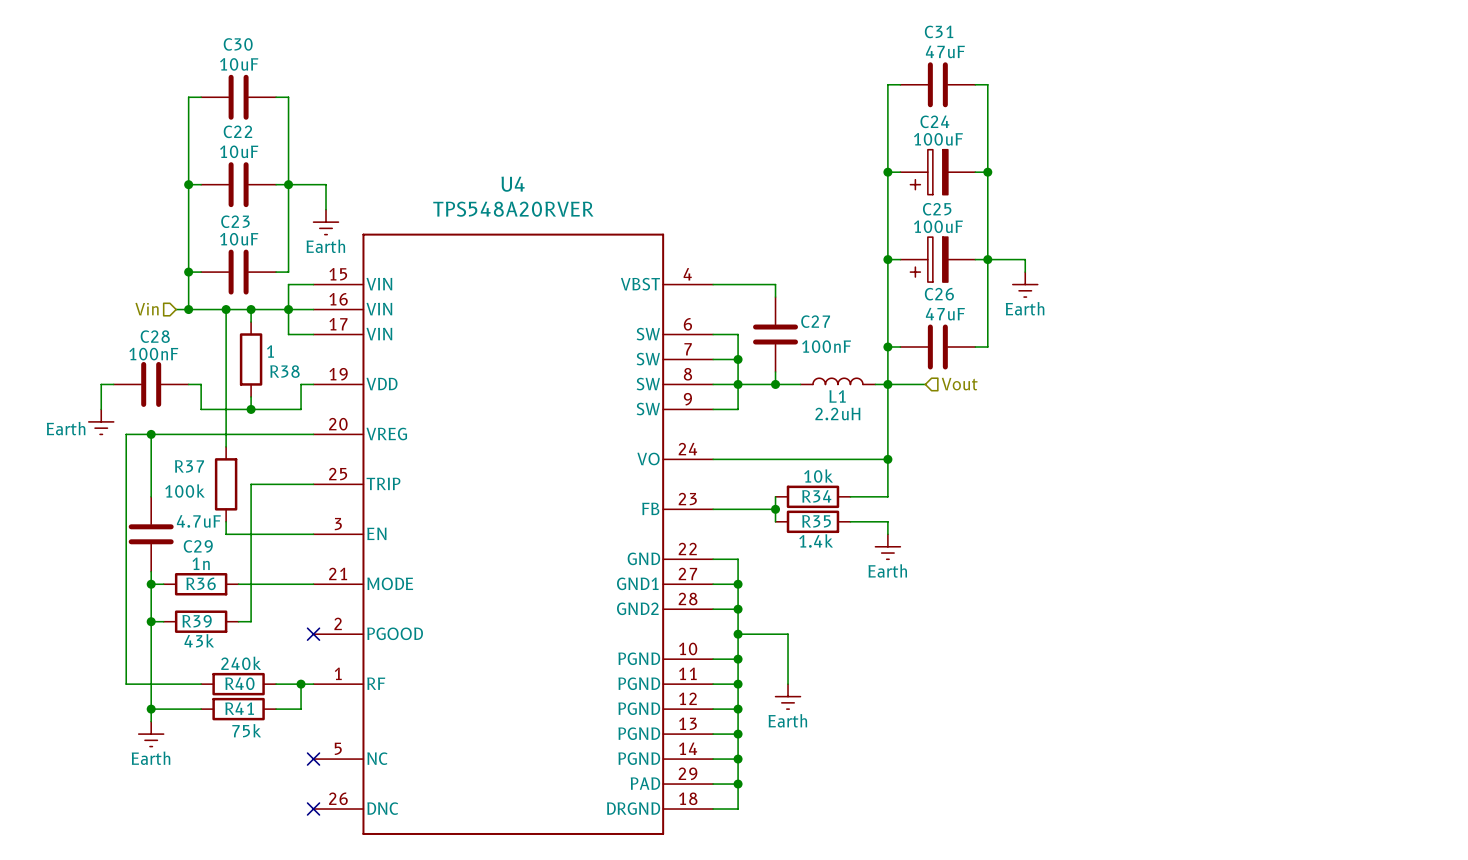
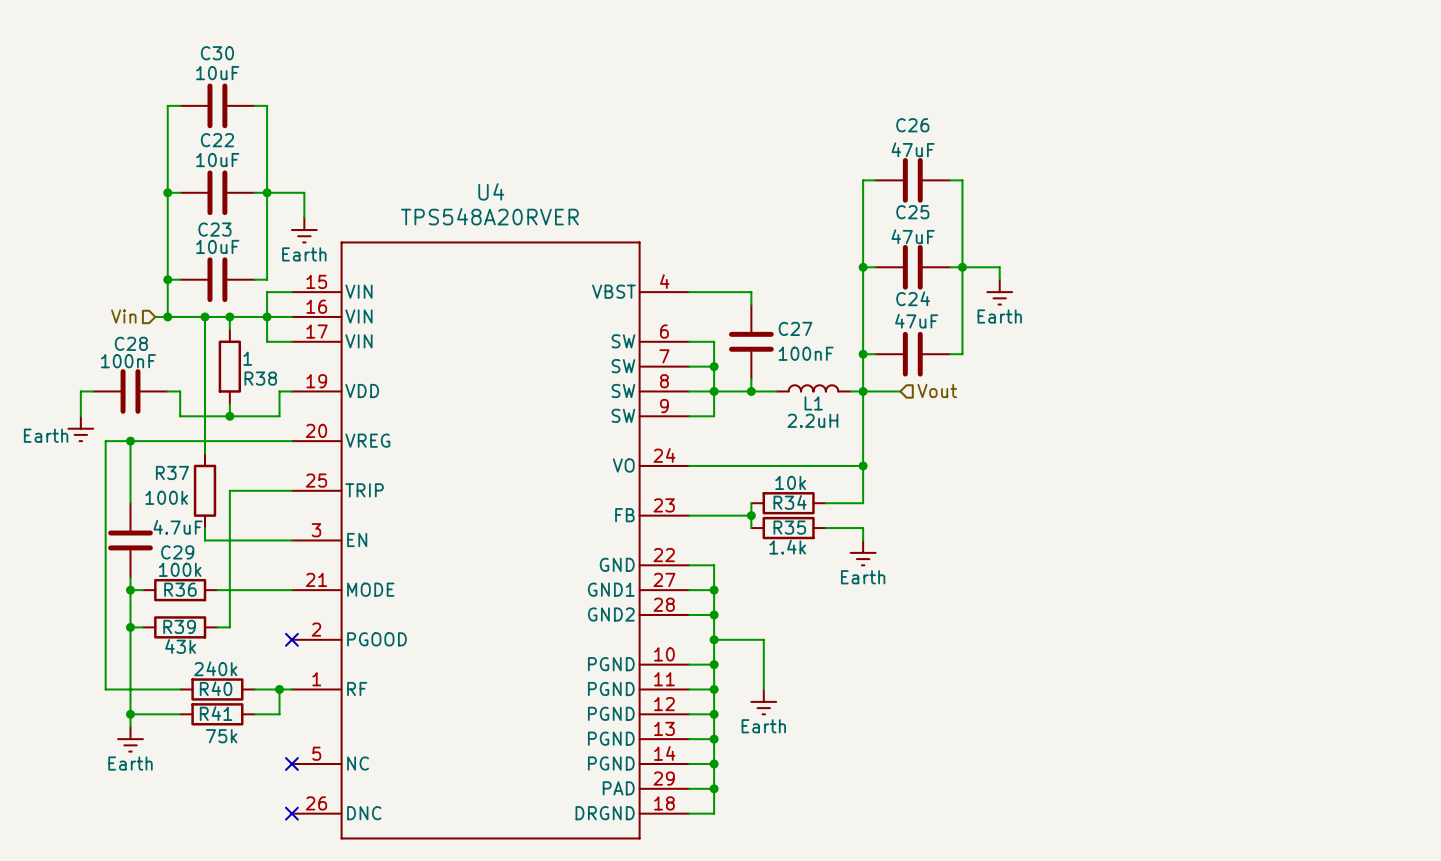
wire: (900, 84) (887, 84) (887, 172) -> none
C31: 47uF (937, 84) -> none
wire: (975, 84) (987, 84) (987, 172) -> none
junction: (887, 172) -> none
C24: 100uF (937, 172) -> none
C26: none -> 47uF (912, 180)
junction: (987, 172) -> none
C25 value: 100uF (938, 226) -> 47uF (913, 236)
C25 symbol: [900, 237, 976, 283] -> [875, 244, 951, 290]
C26 name: C26 (939, 294) -> C24 (913, 298)
R36 value: 1n (201, 563) -> 100k (180, 569)

